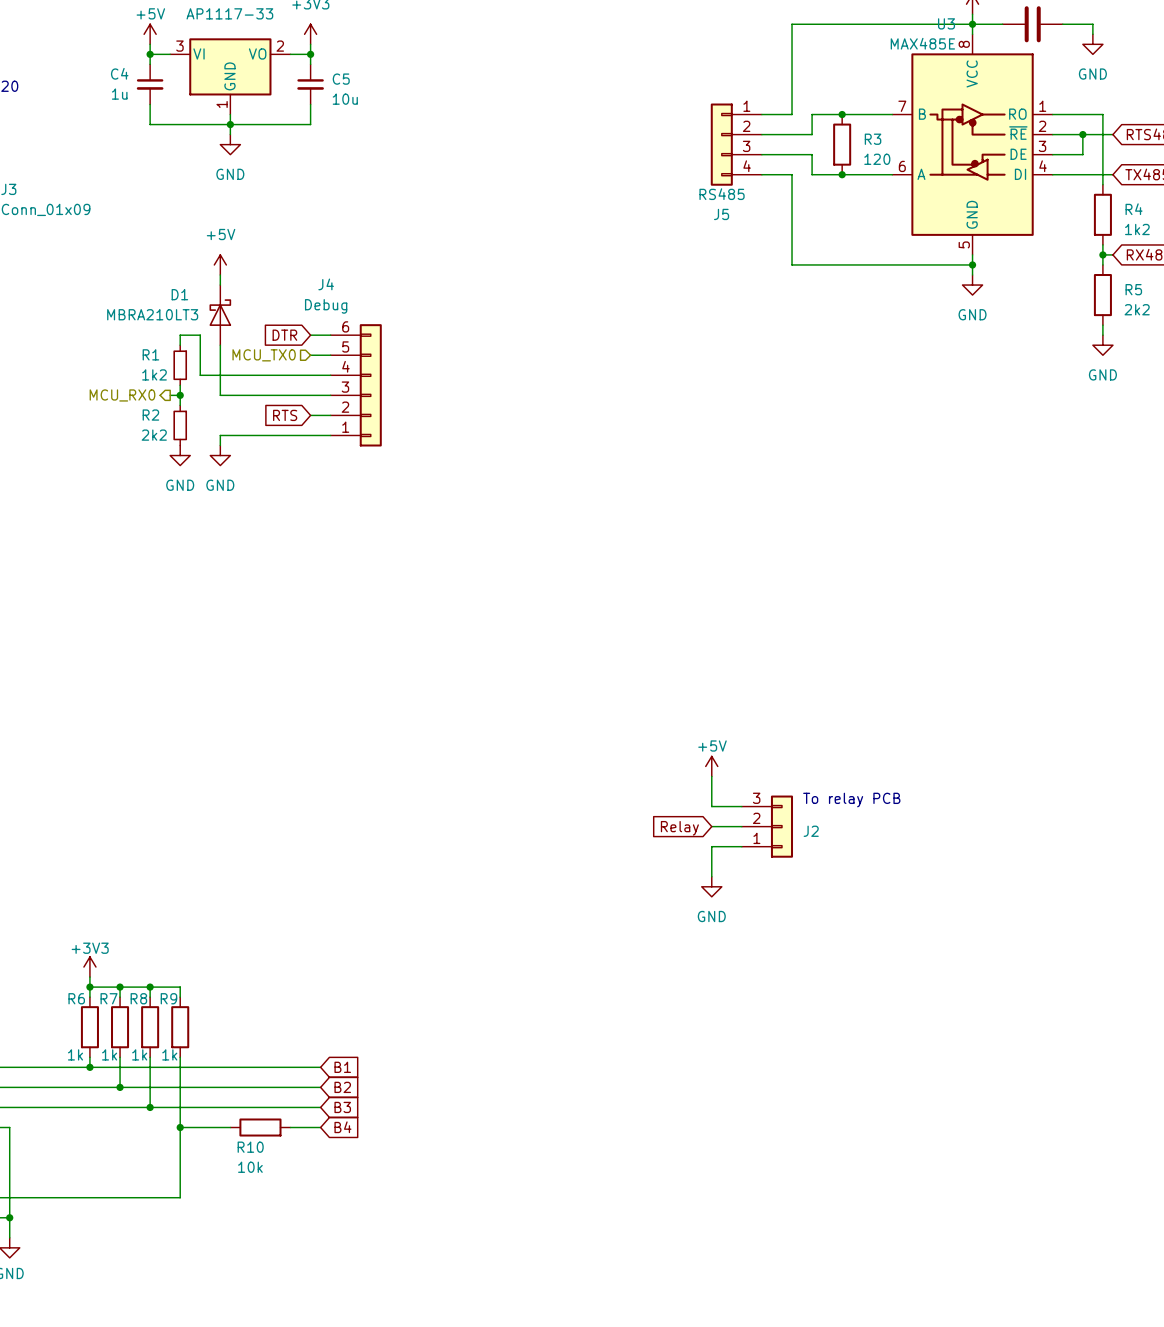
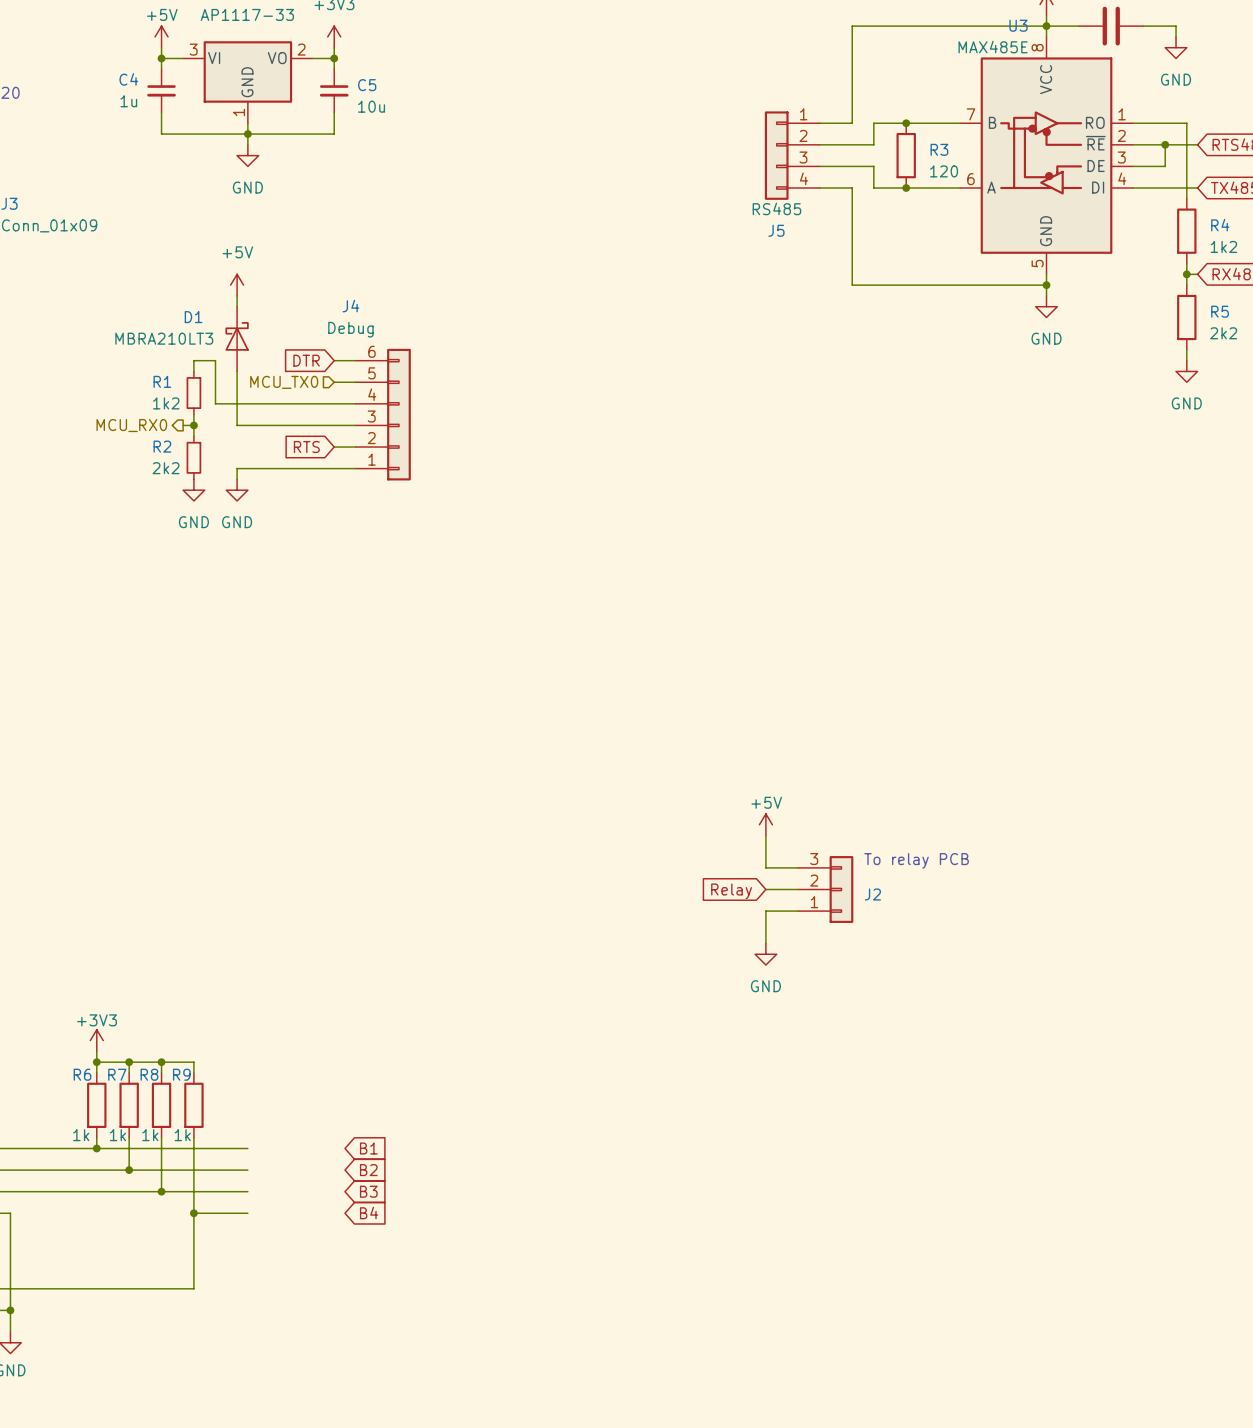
wire: (230, 1067) (320, 1067) -> none
wire: (230, 1087) (320, 1087) -> none
wire: (230, 1107) (320, 1107) -> none
R10: 10k (260, 1127) -> none
wire: (290, 1127) (320, 1127) -> none

